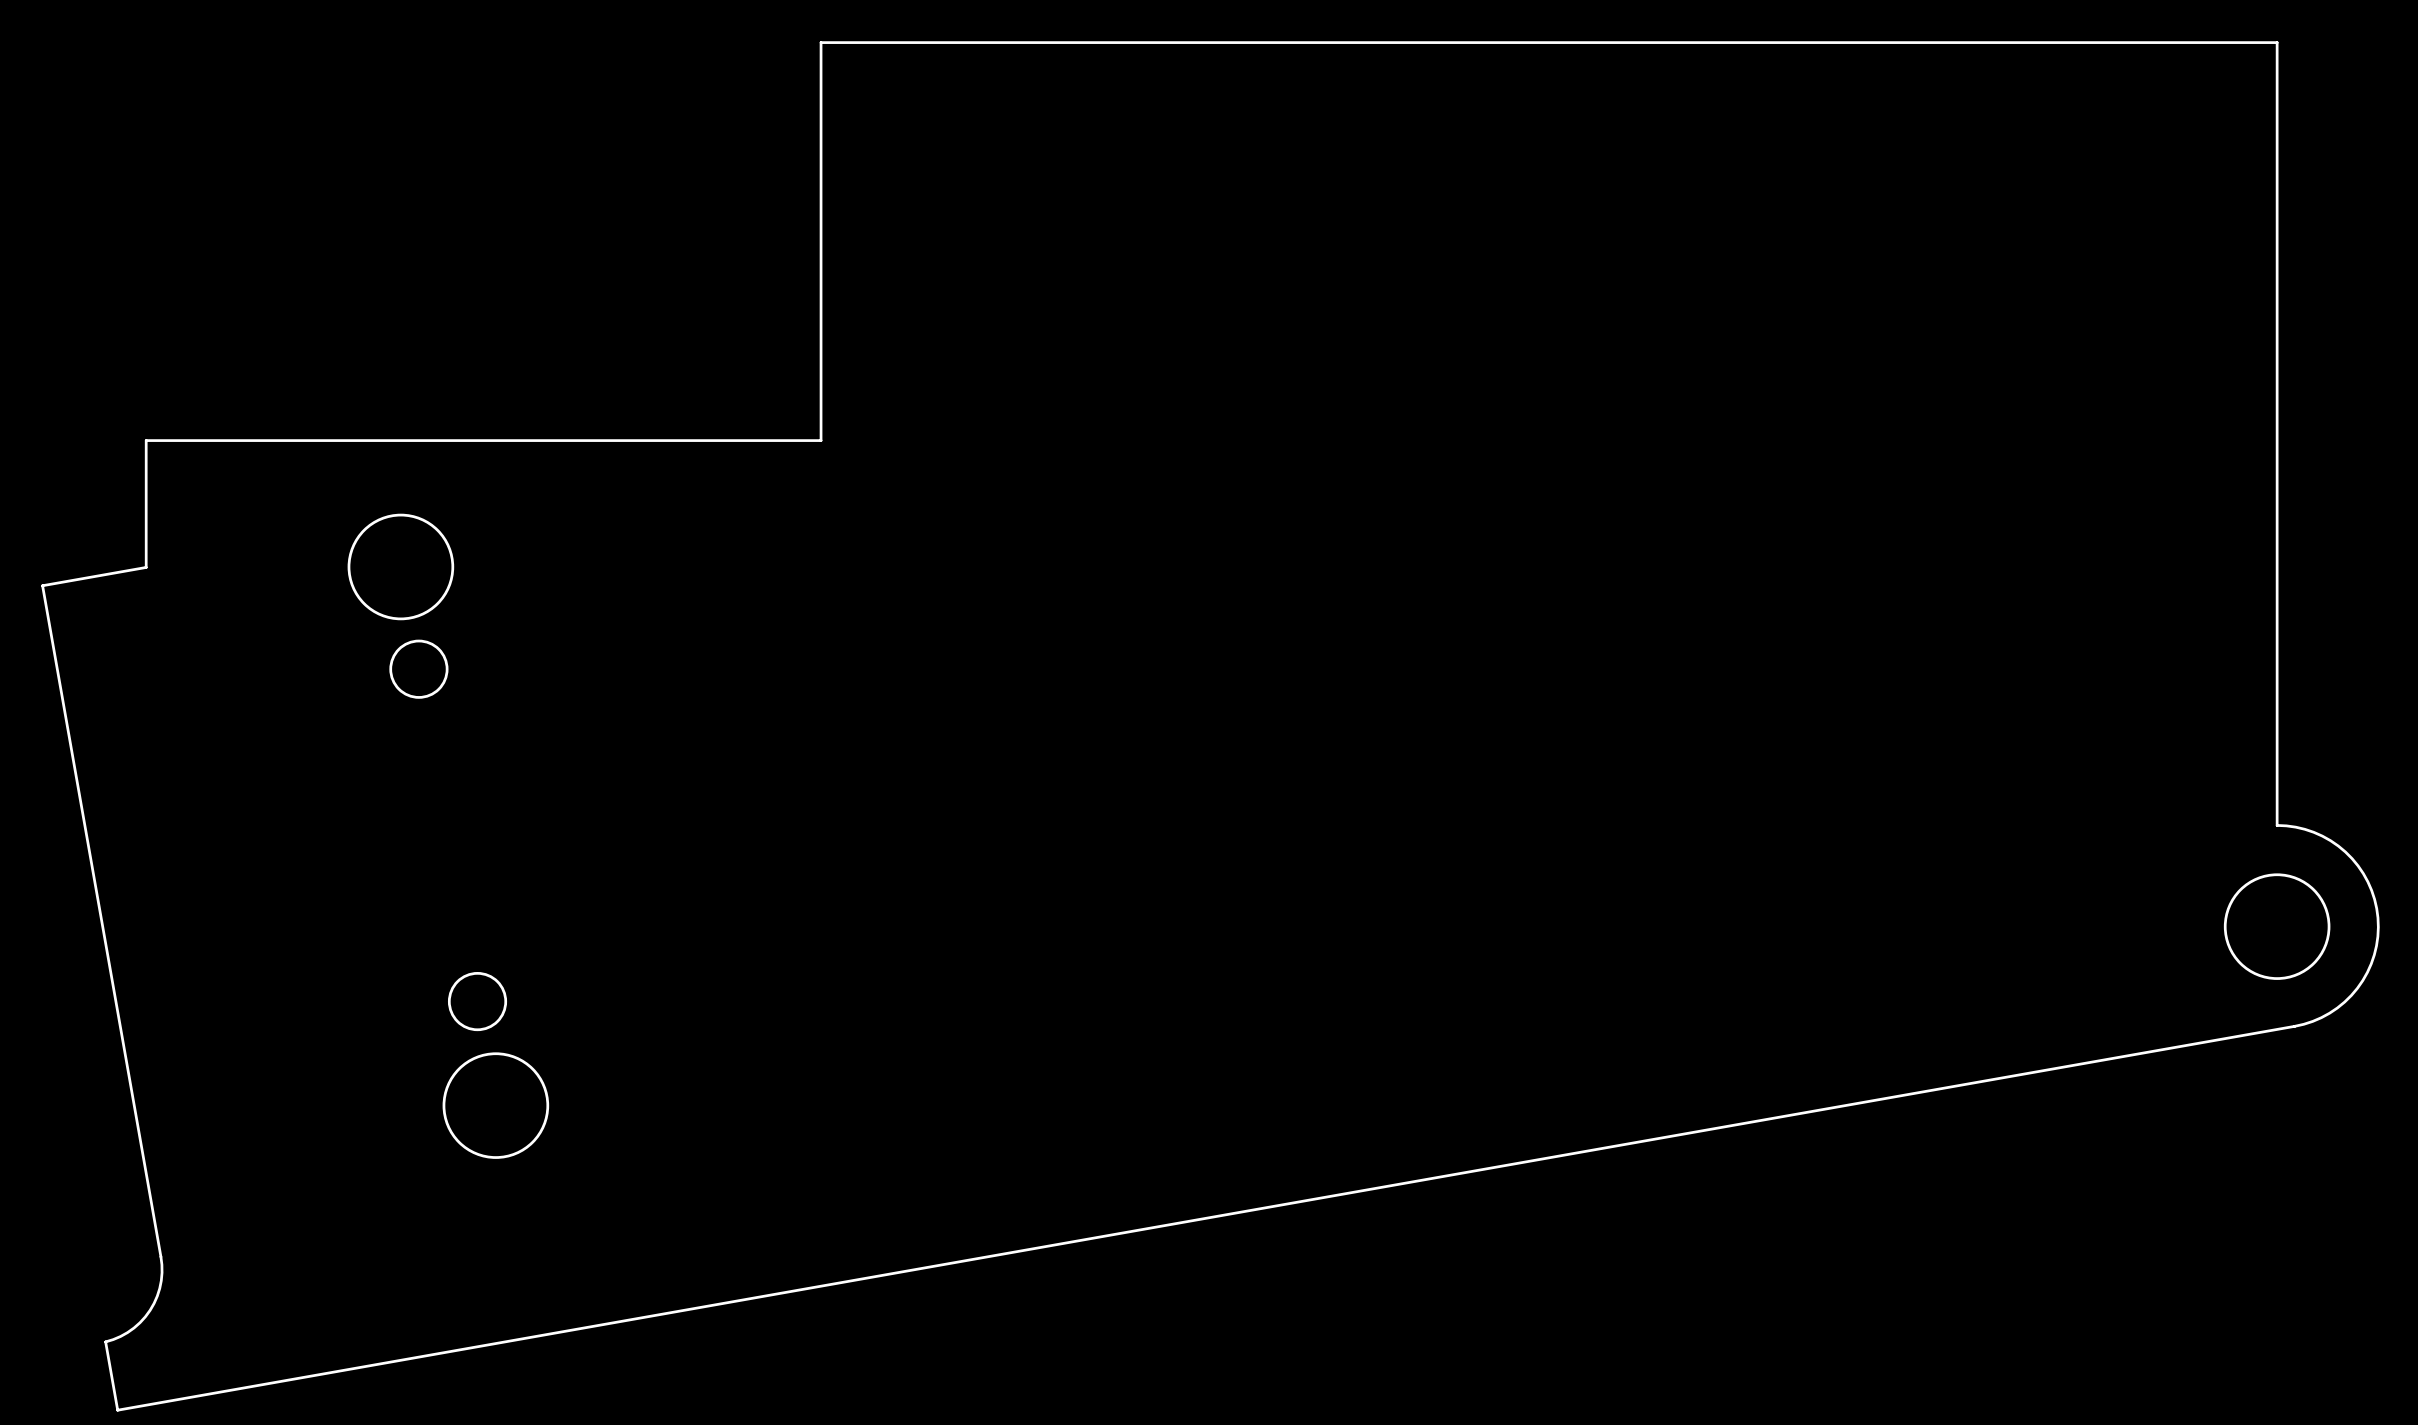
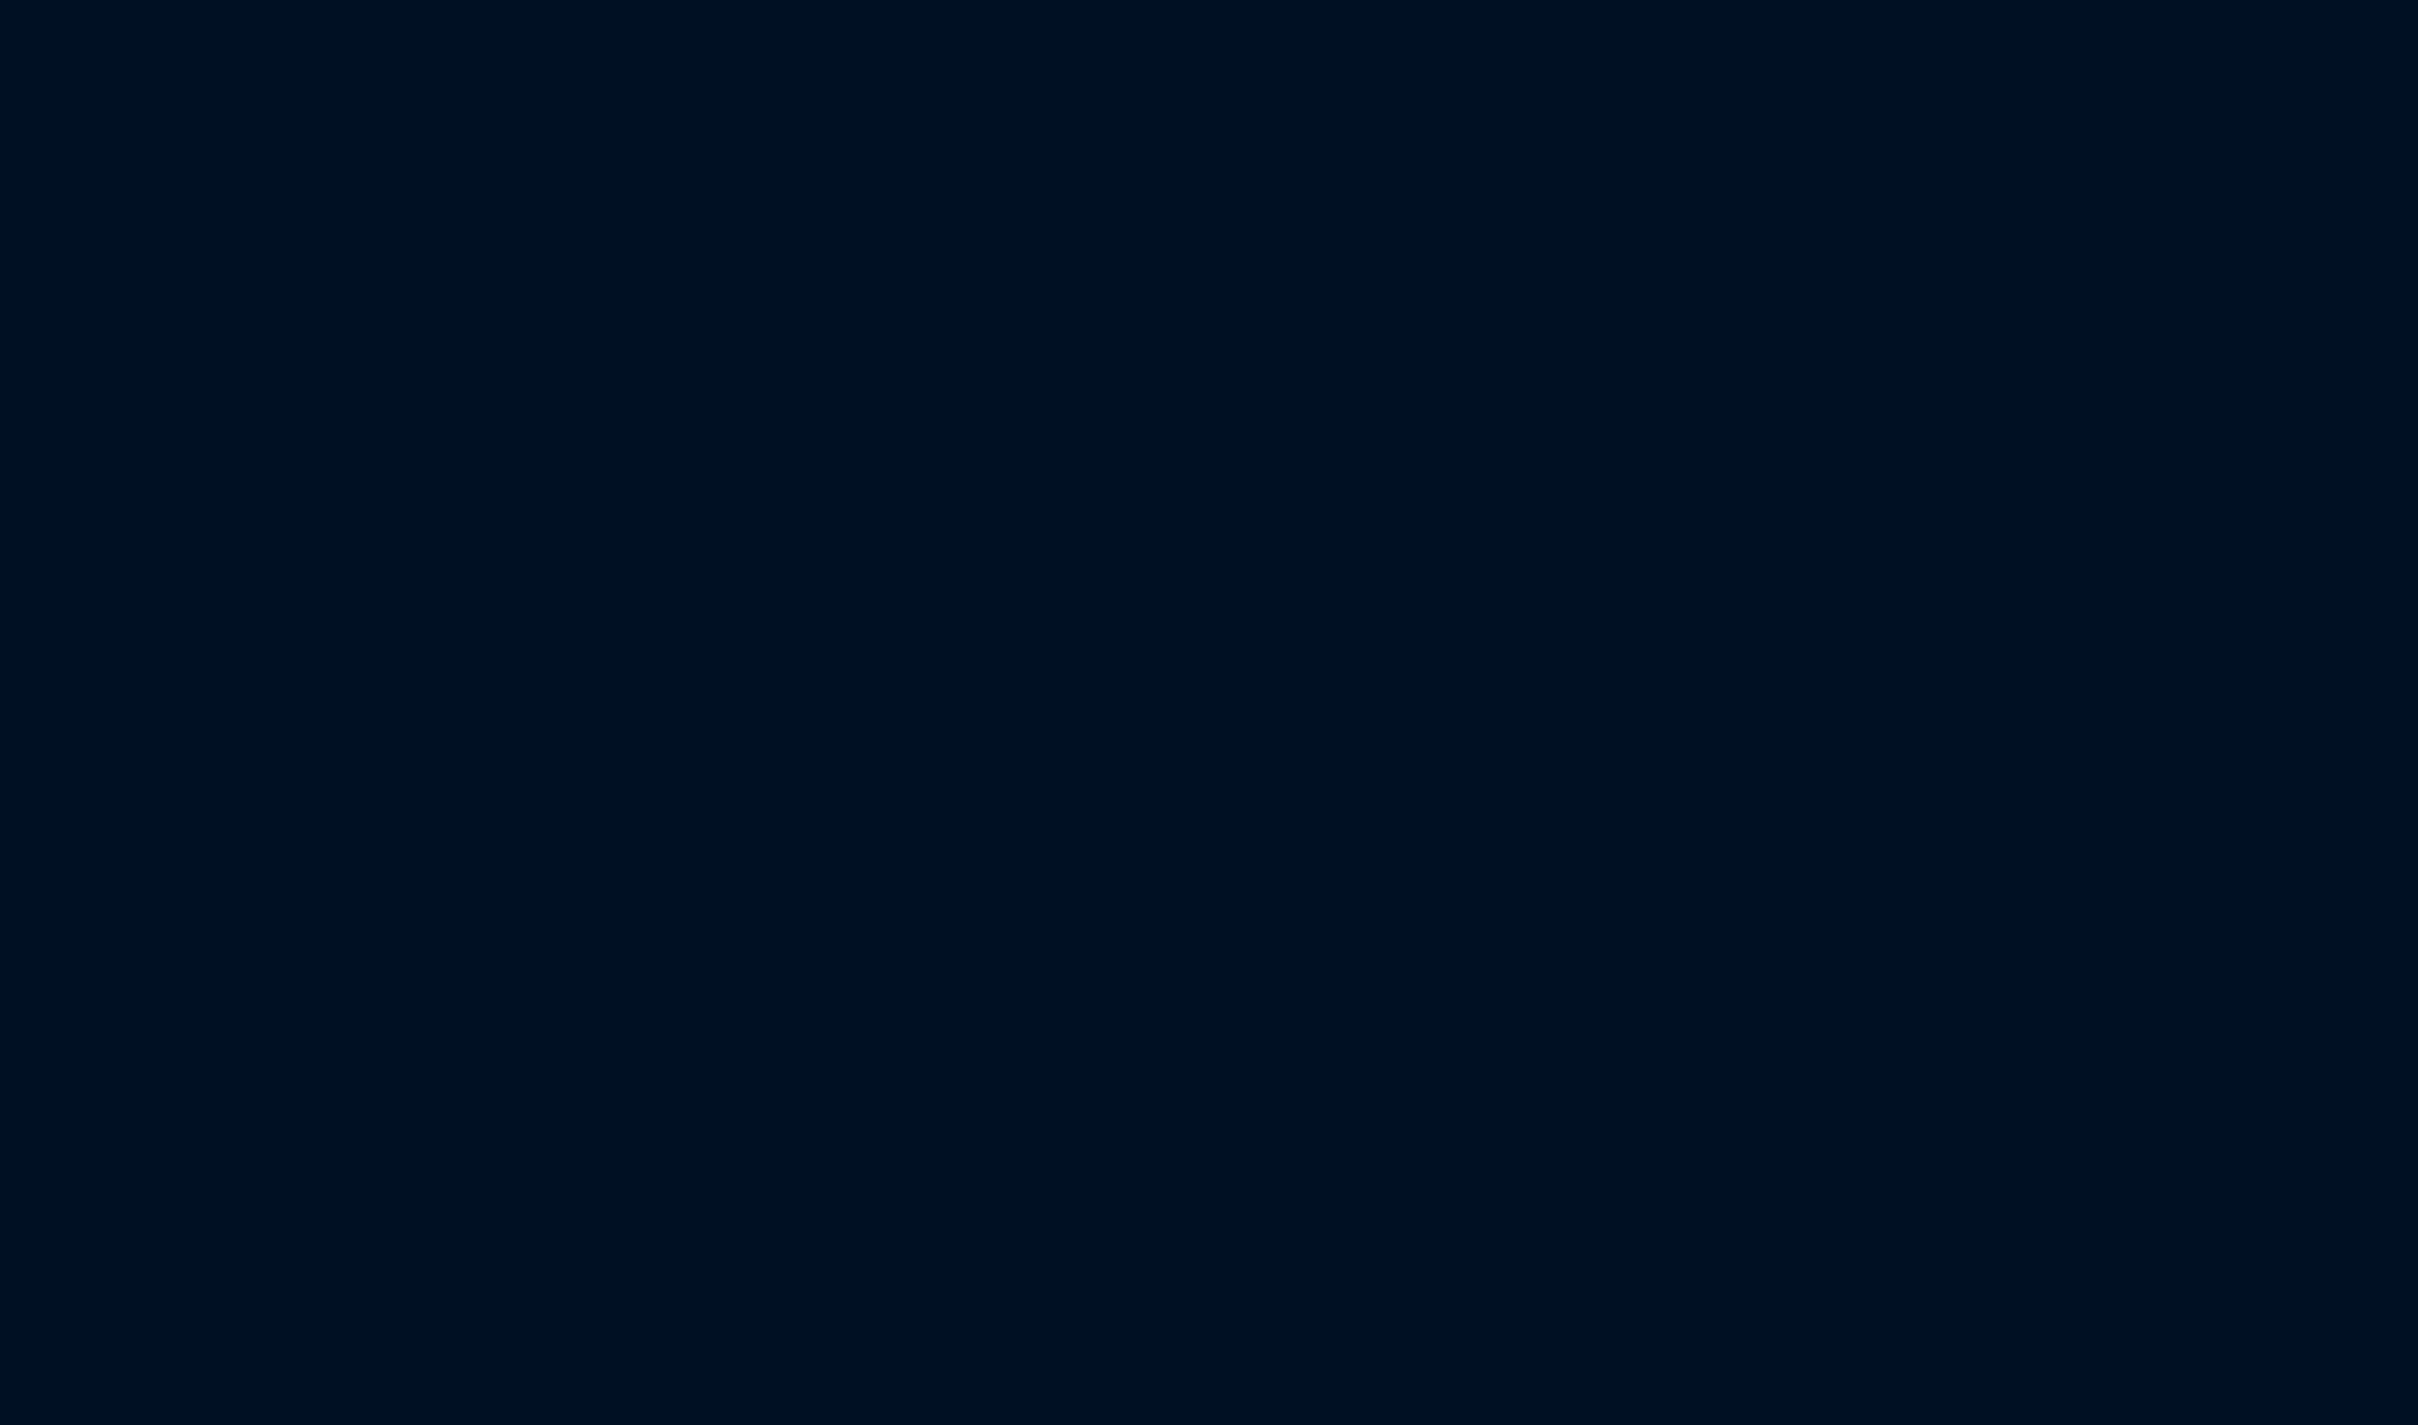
board edge: (2277, 42) (821, 42) (821, 440) (146, 440) (146, 567) (42, 585) (161, 1264) (159, 1288) (154, 1303) (145, 1316) (127, 1332) (105, 1341) (117, 1410) (2294, 1026) (2312, 1021) (2329, 1013) (2351, 995) (2367, 972) (2376, 945) (2377, 917) (2374, 899) (2367, 881) (2358, 865) (2345, 852) (2330, 840) (2313, 832) (2295, 827) (2277, 825) (2277, 42) -> none
round board edge: [347, 513, 455, 621] -> none
round board edge: [389, 639, 449, 699] -> none
round board edge: [2223, 873, 2331, 980] -> none
round board edge: [447, 971, 508, 1032] -> none
round board edge: [442, 1052, 550, 1159] -> none

